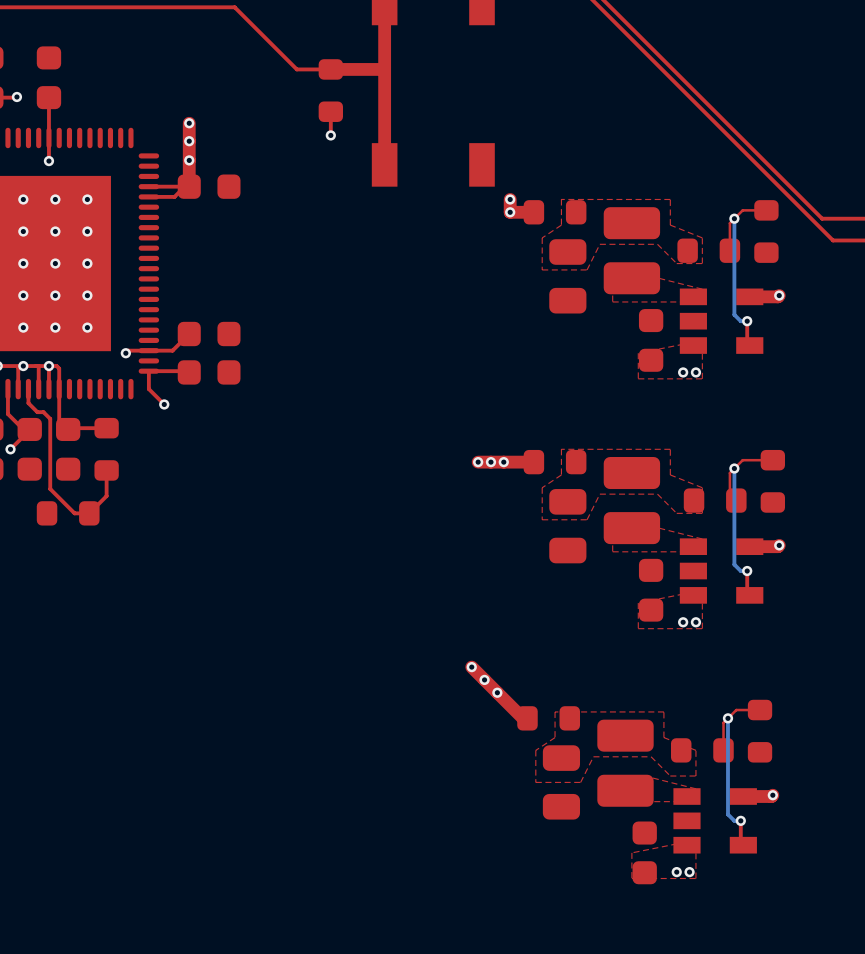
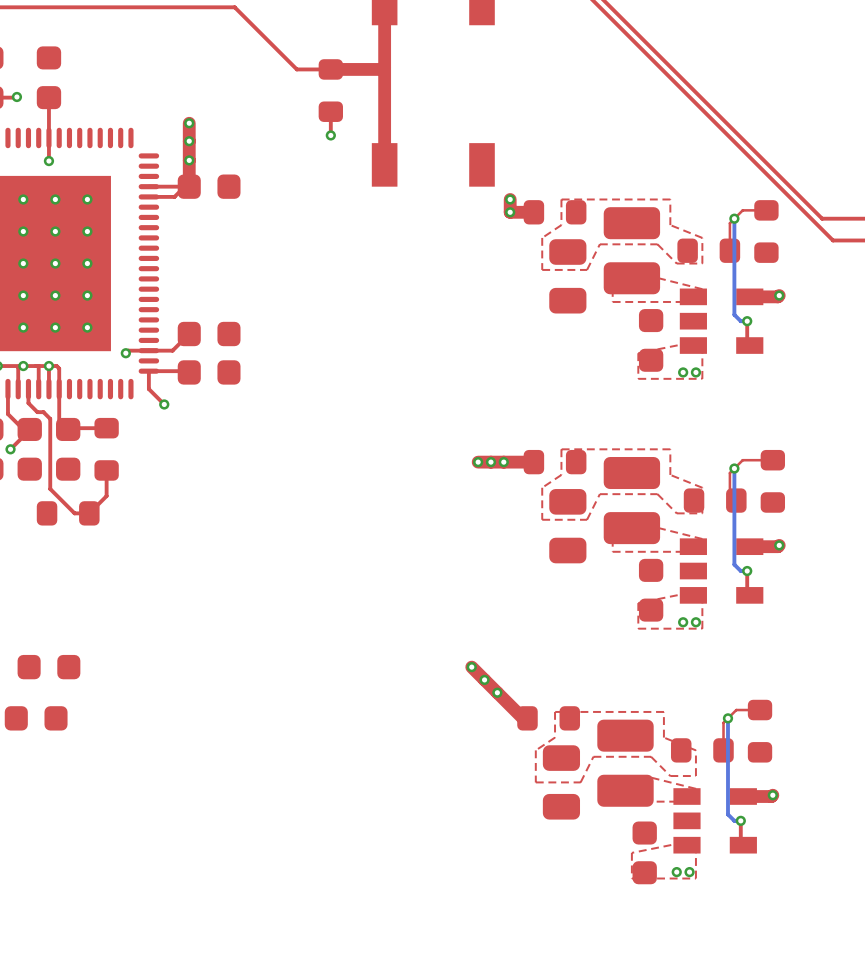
part: none -> (48, 667)
part: none -> (36, 718)

